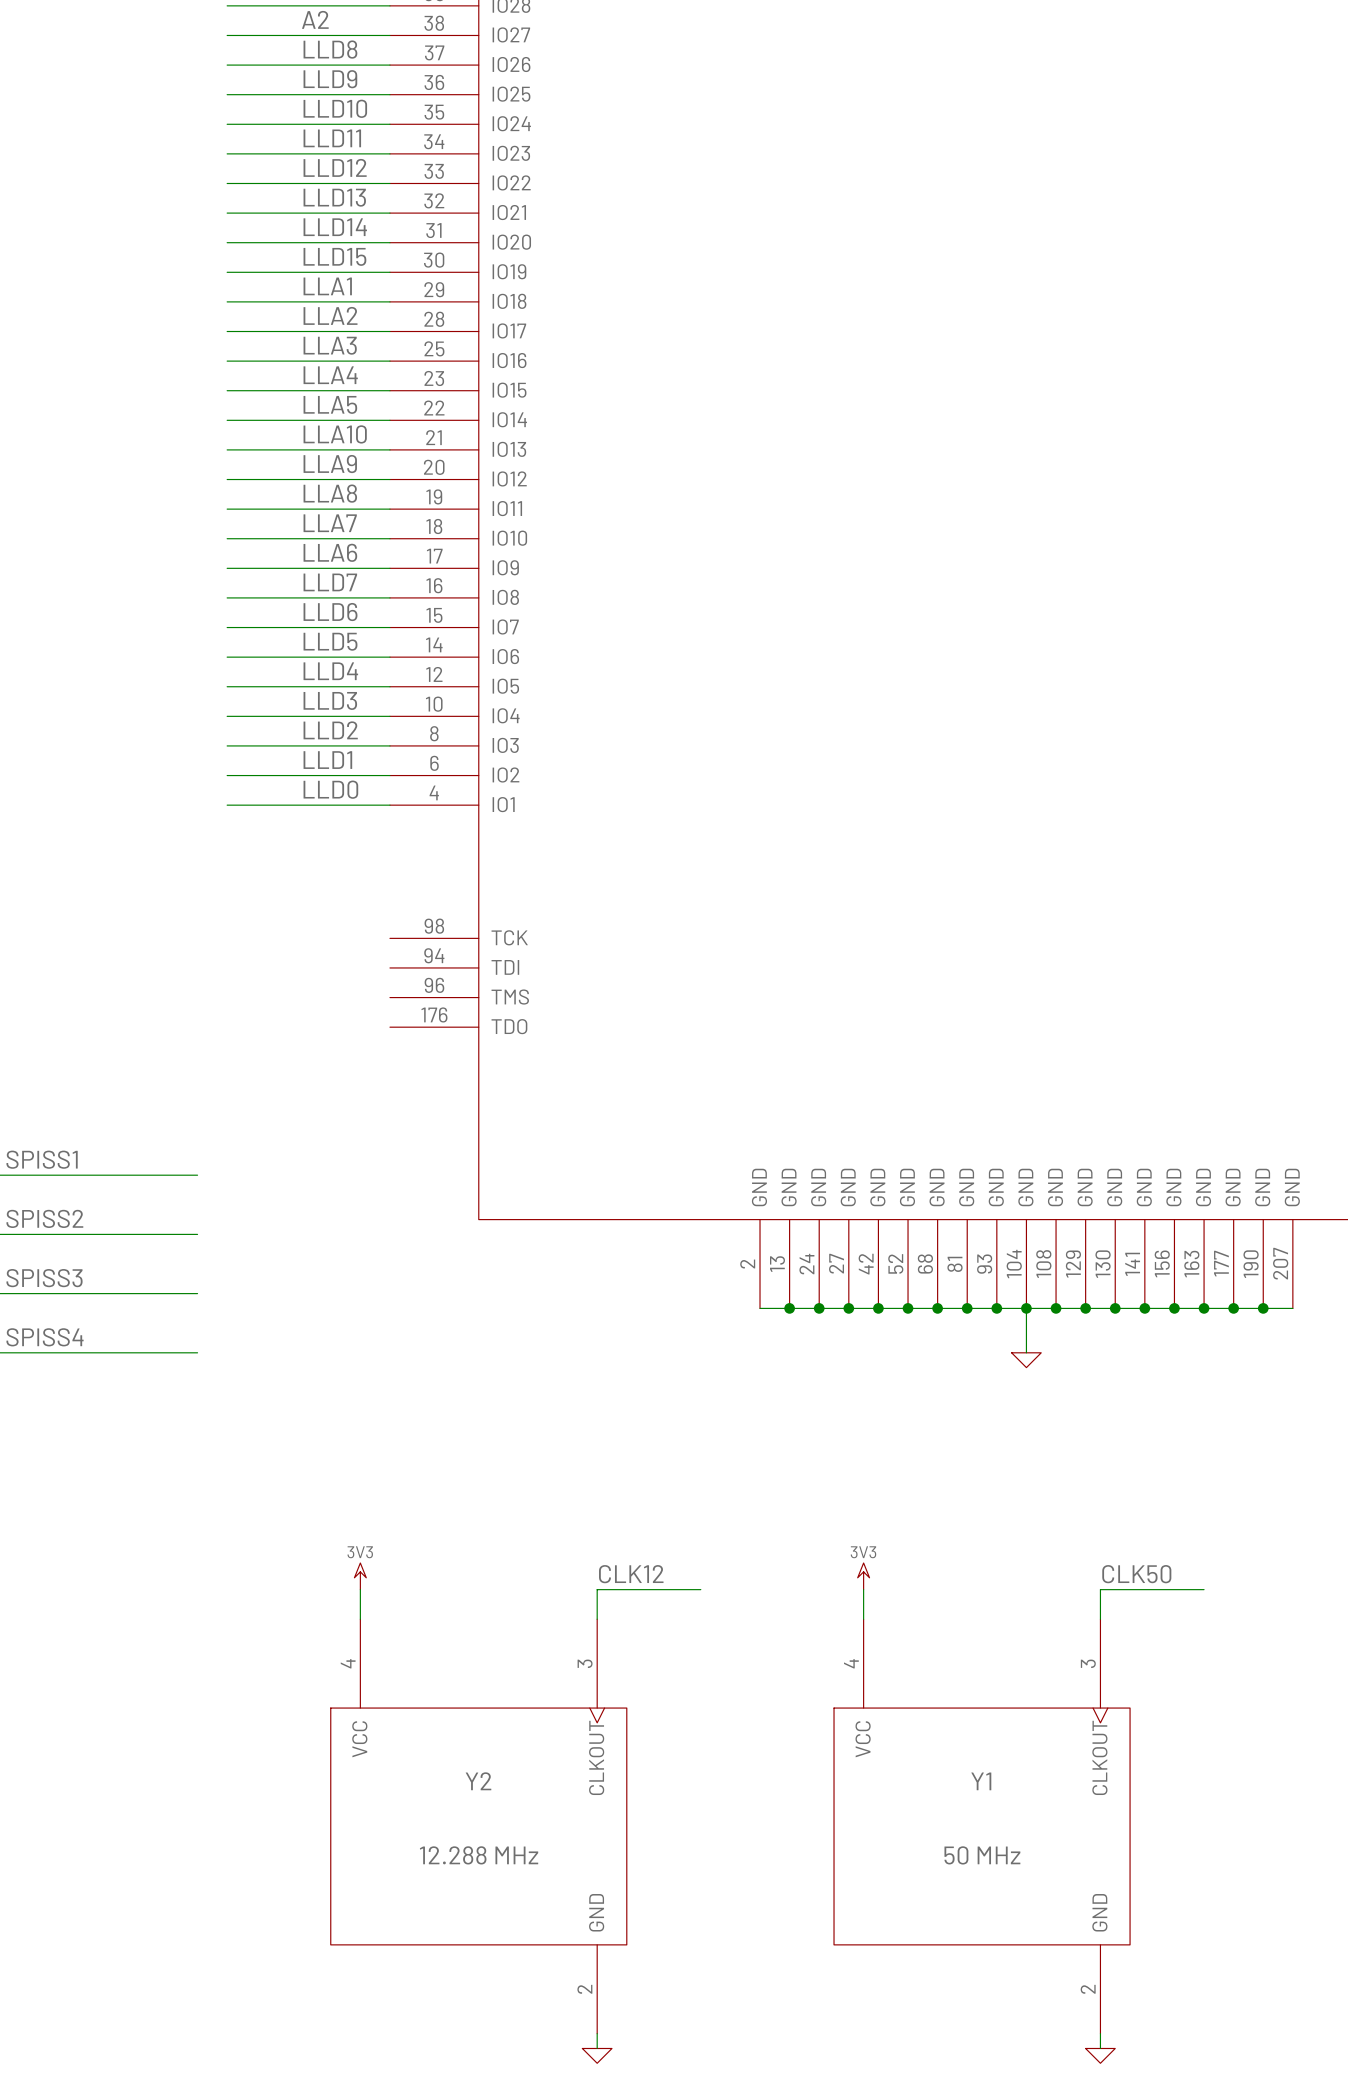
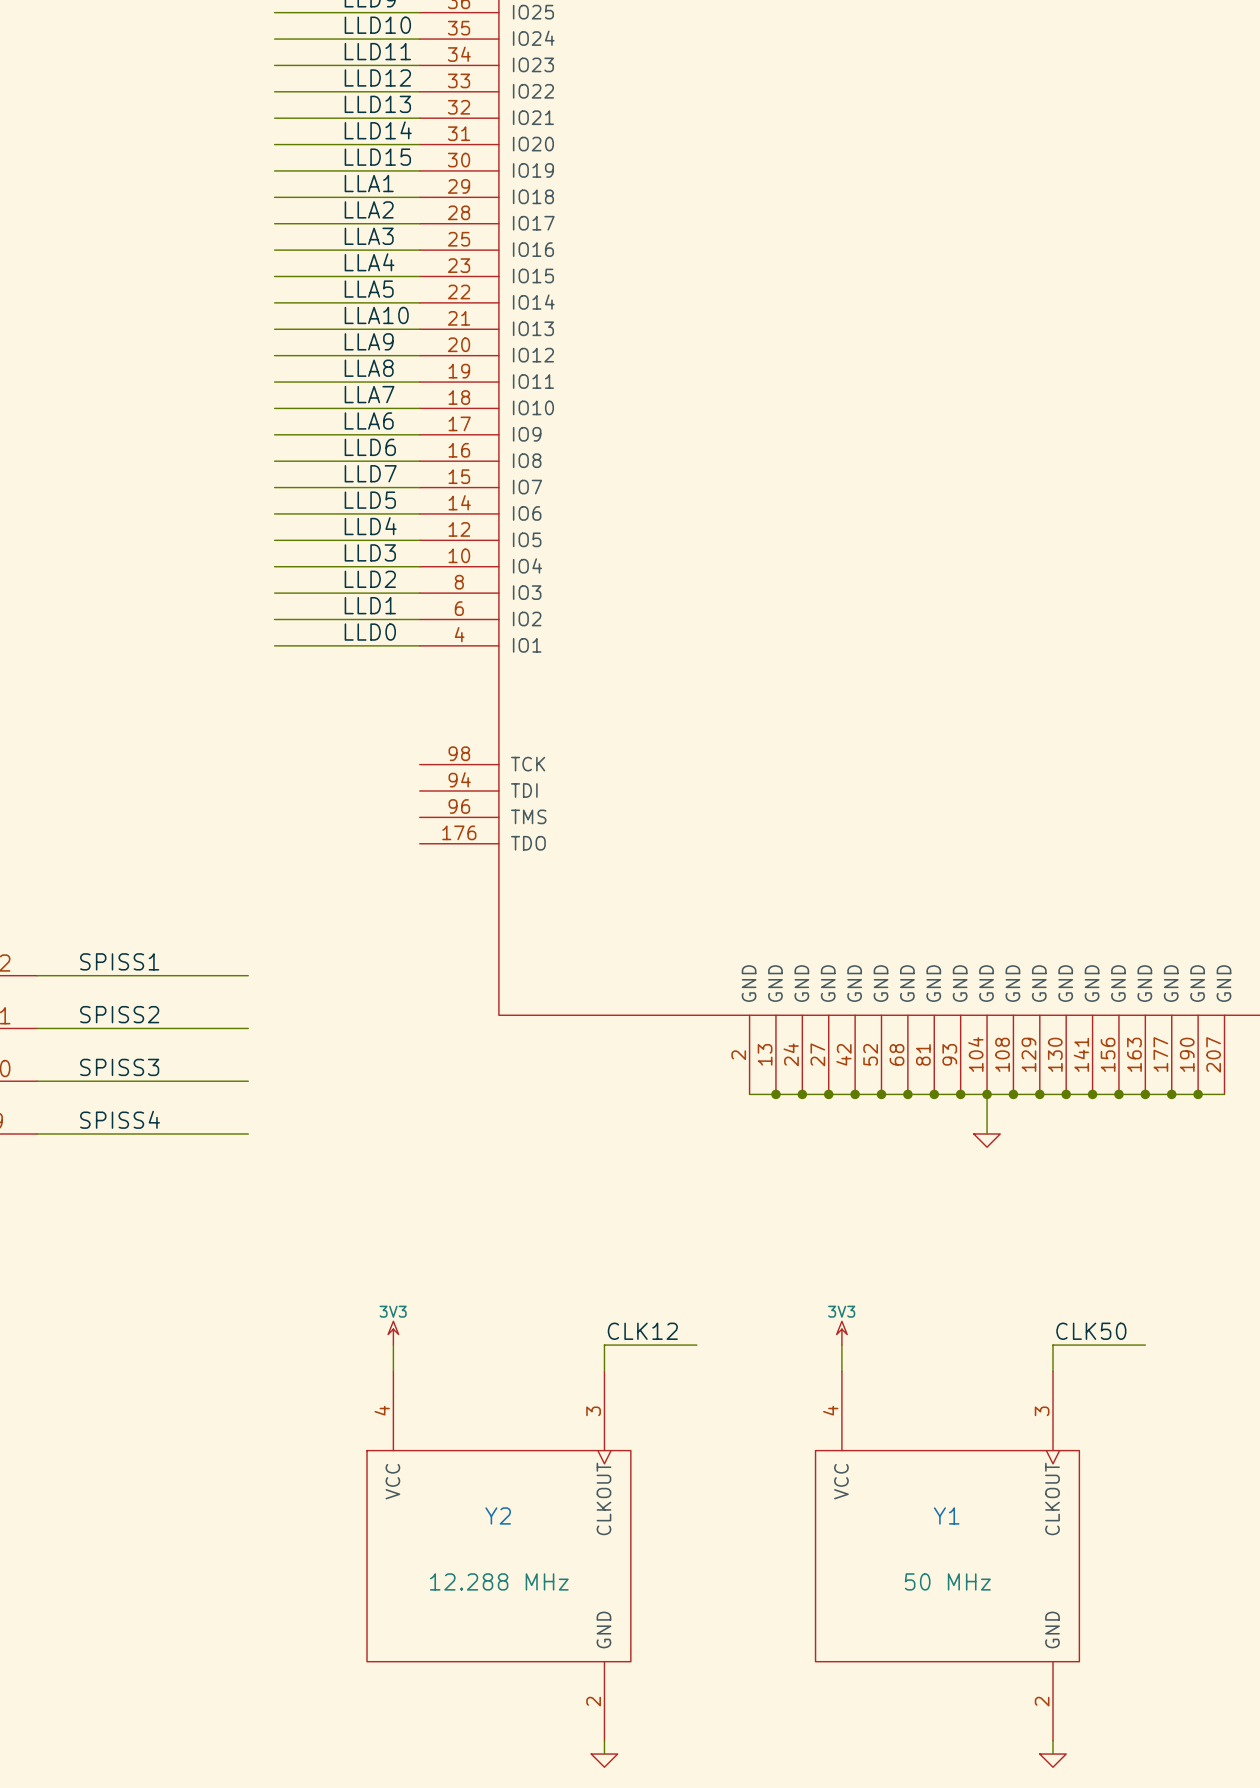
label: LLD7 (330, 582) -> LLD6 (370, 447)
label: LLD6 (330, 612) -> LLD7 (370, 473)

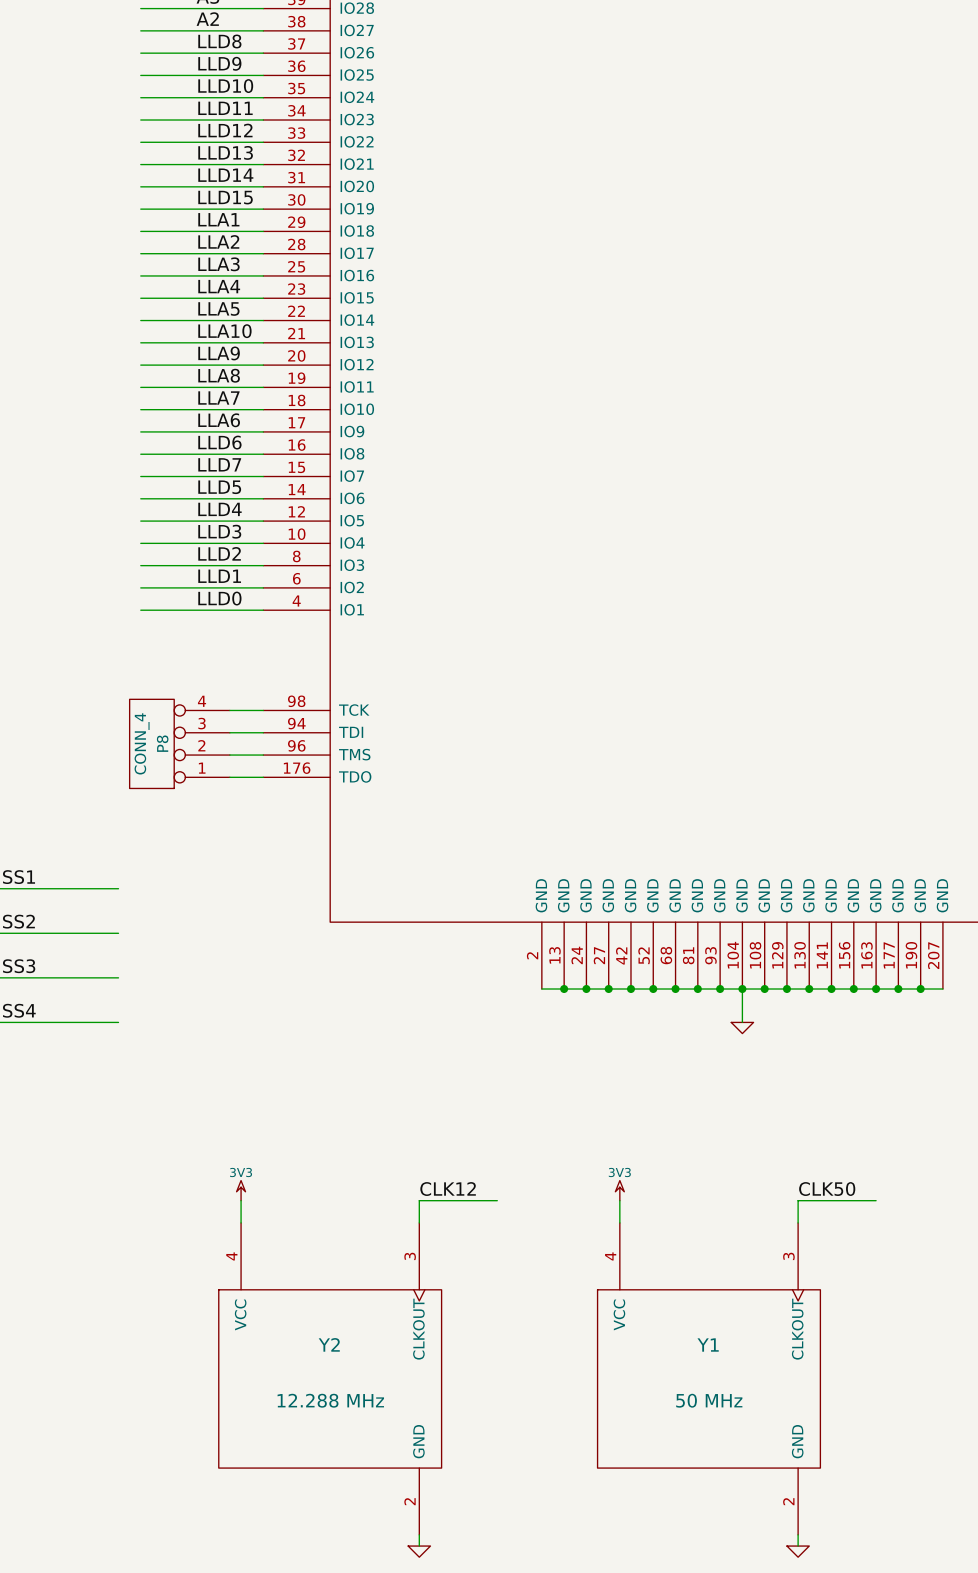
wire: none -> (229, 710) (263, 710)
wire: none -> (229, 732) (263, 732)
P8: none -> CONN_4 (179, 743)
wire: none -> (229, 755) (263, 755)
wire: none -> (229, 777) (263, 777)

